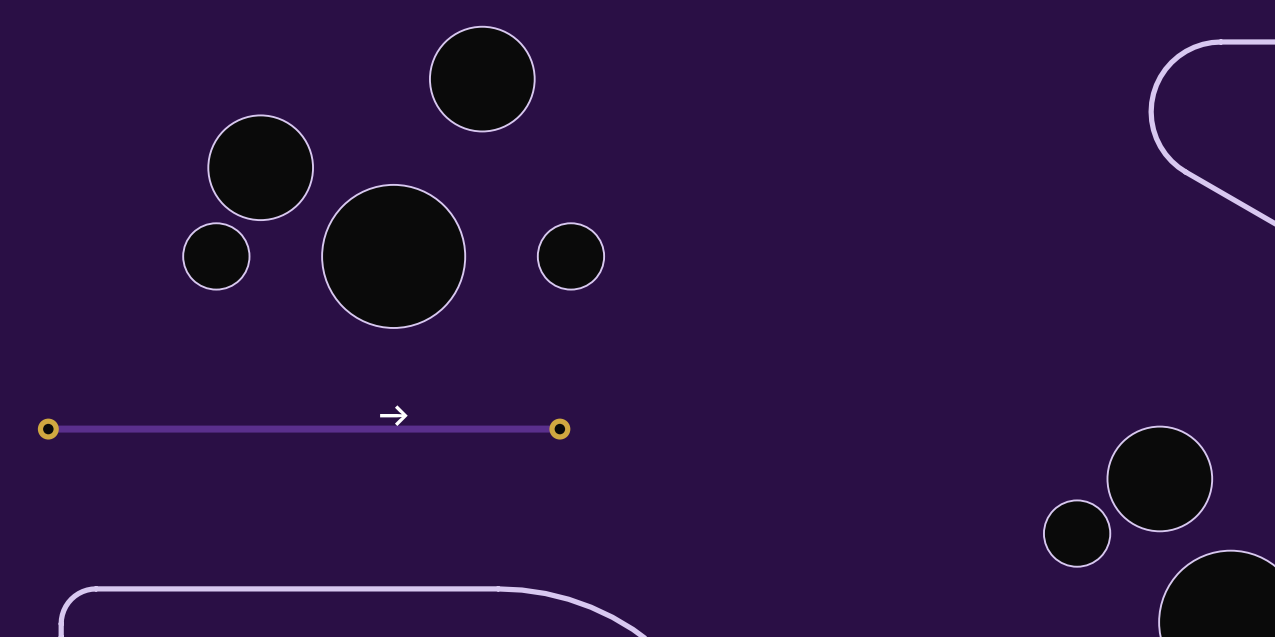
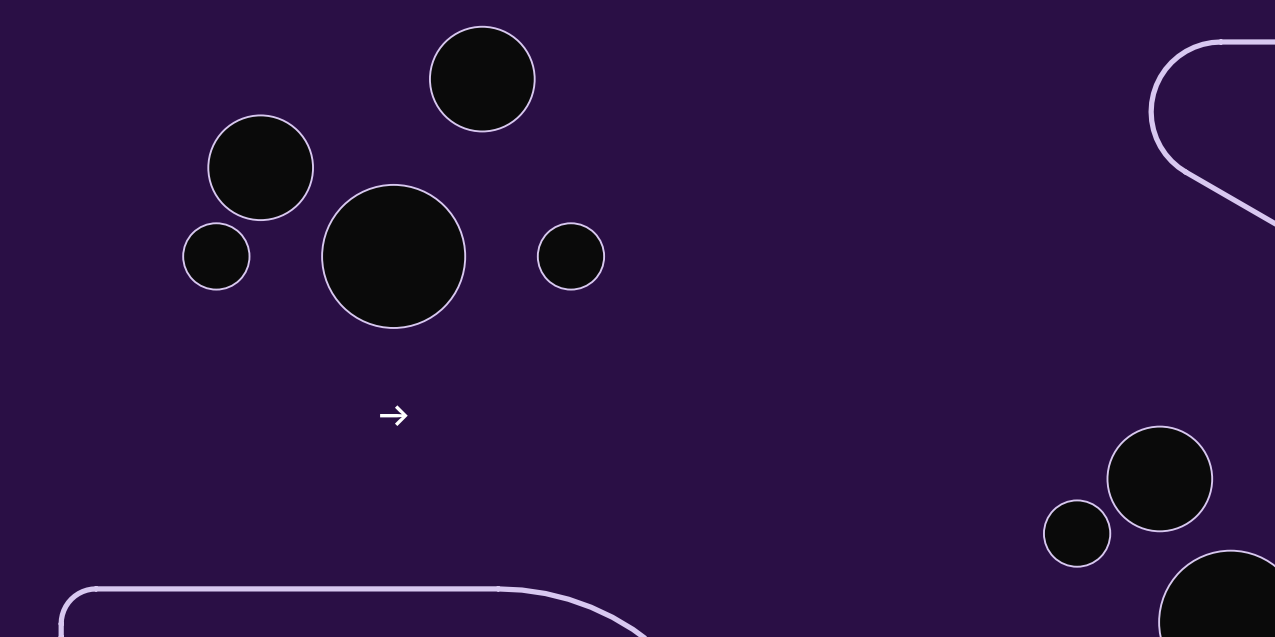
track: (48, 429) (559, 429) -> none
via: (48, 429) -> none
via: (559, 429) -> none

